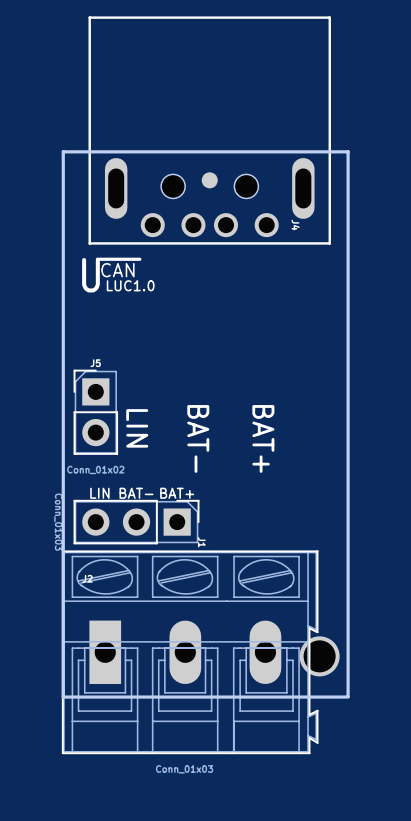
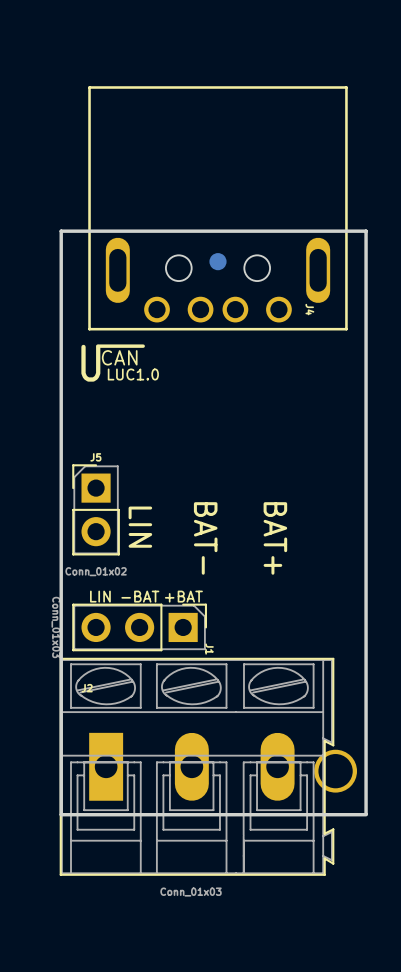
text: BAT- (136, 493) -> -BAT (140, 596)
text: BAT+ (177, 493) -> +BAT (183, 596)

